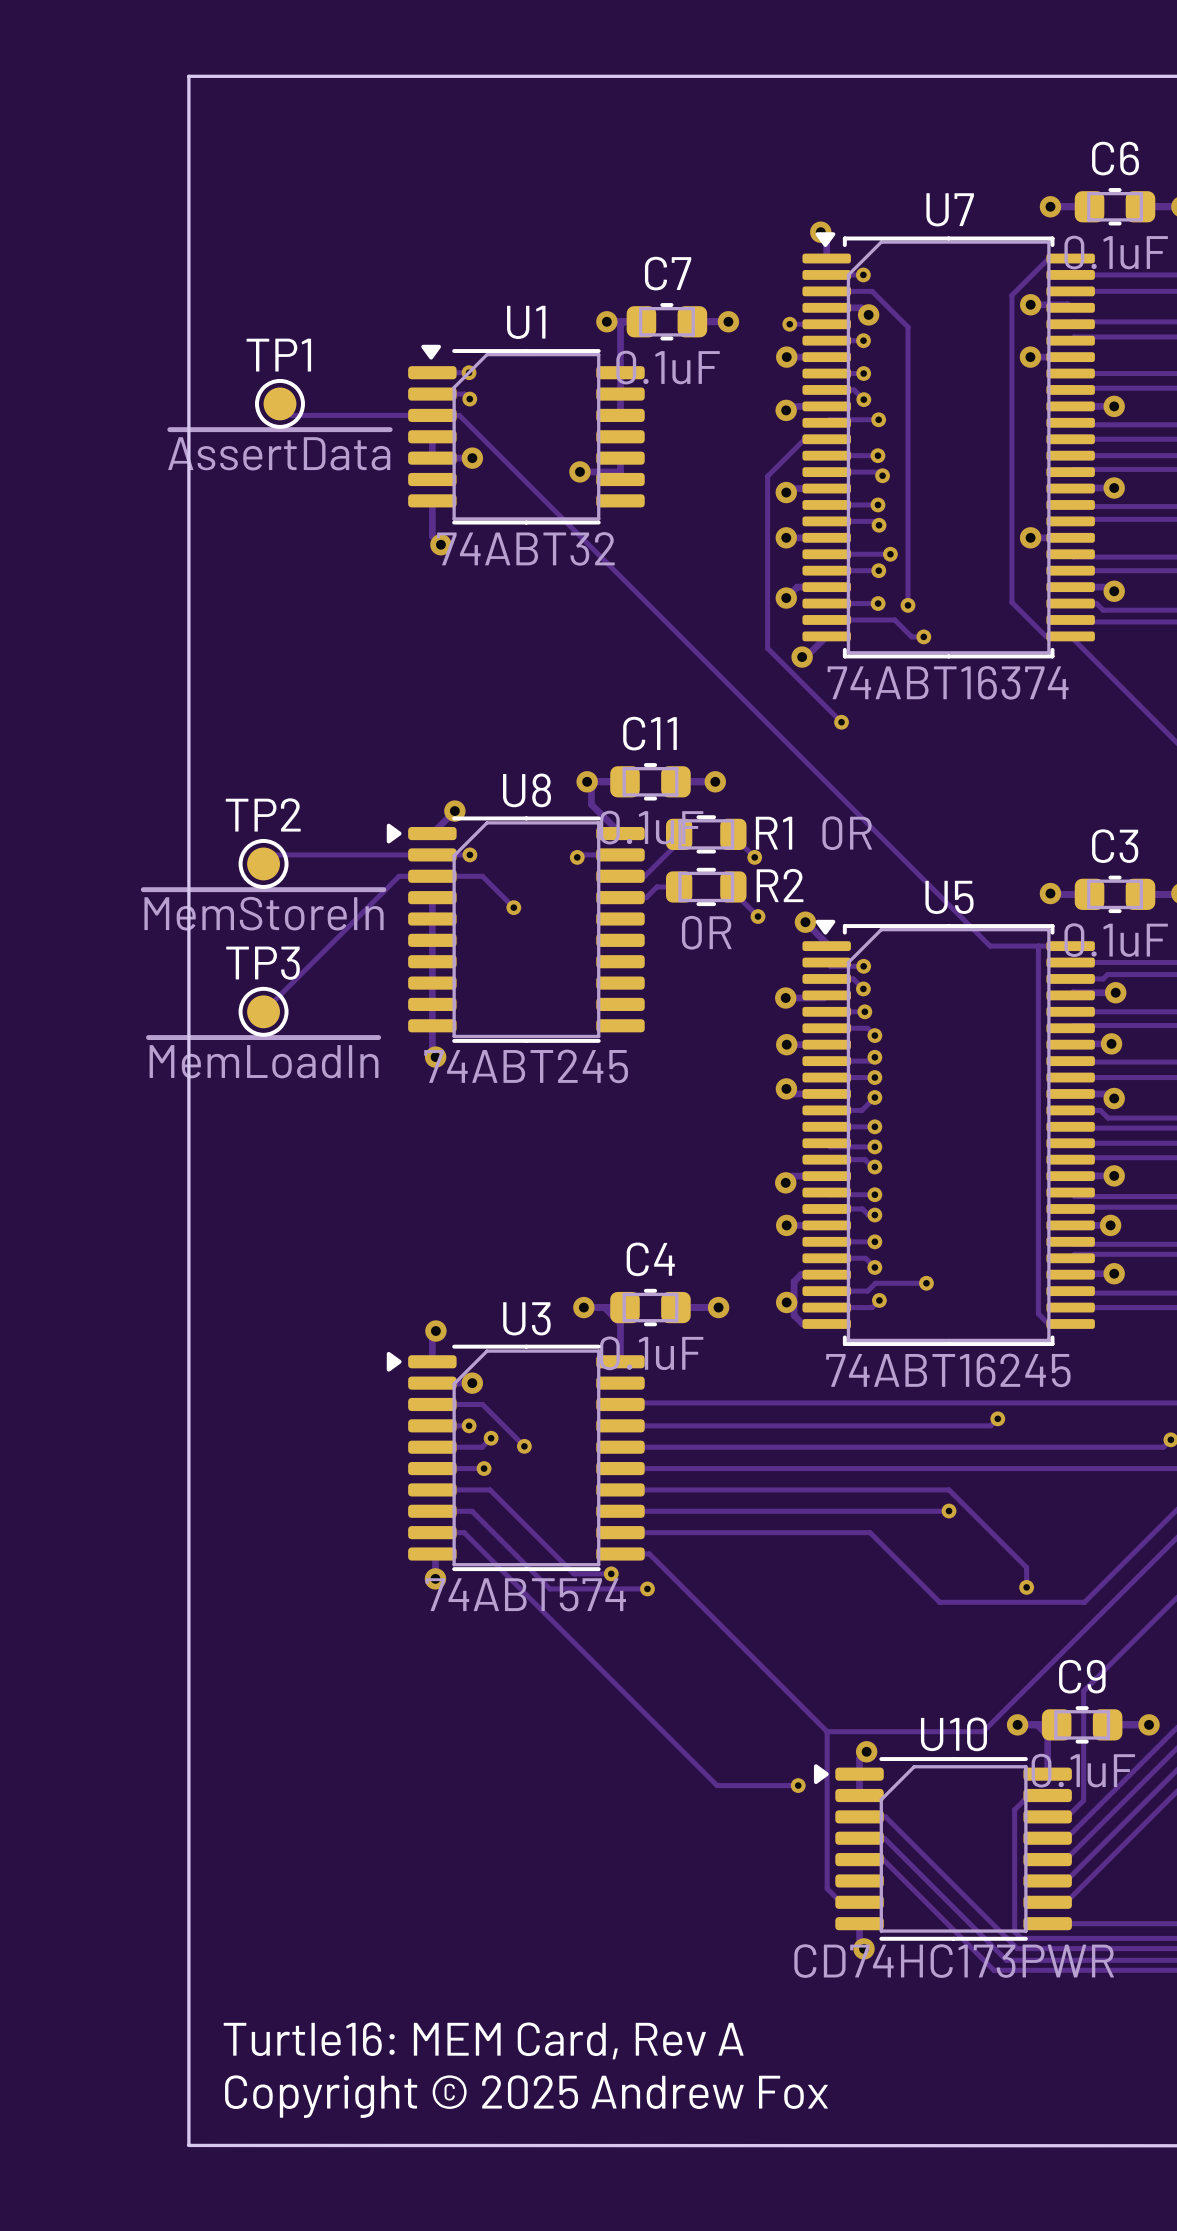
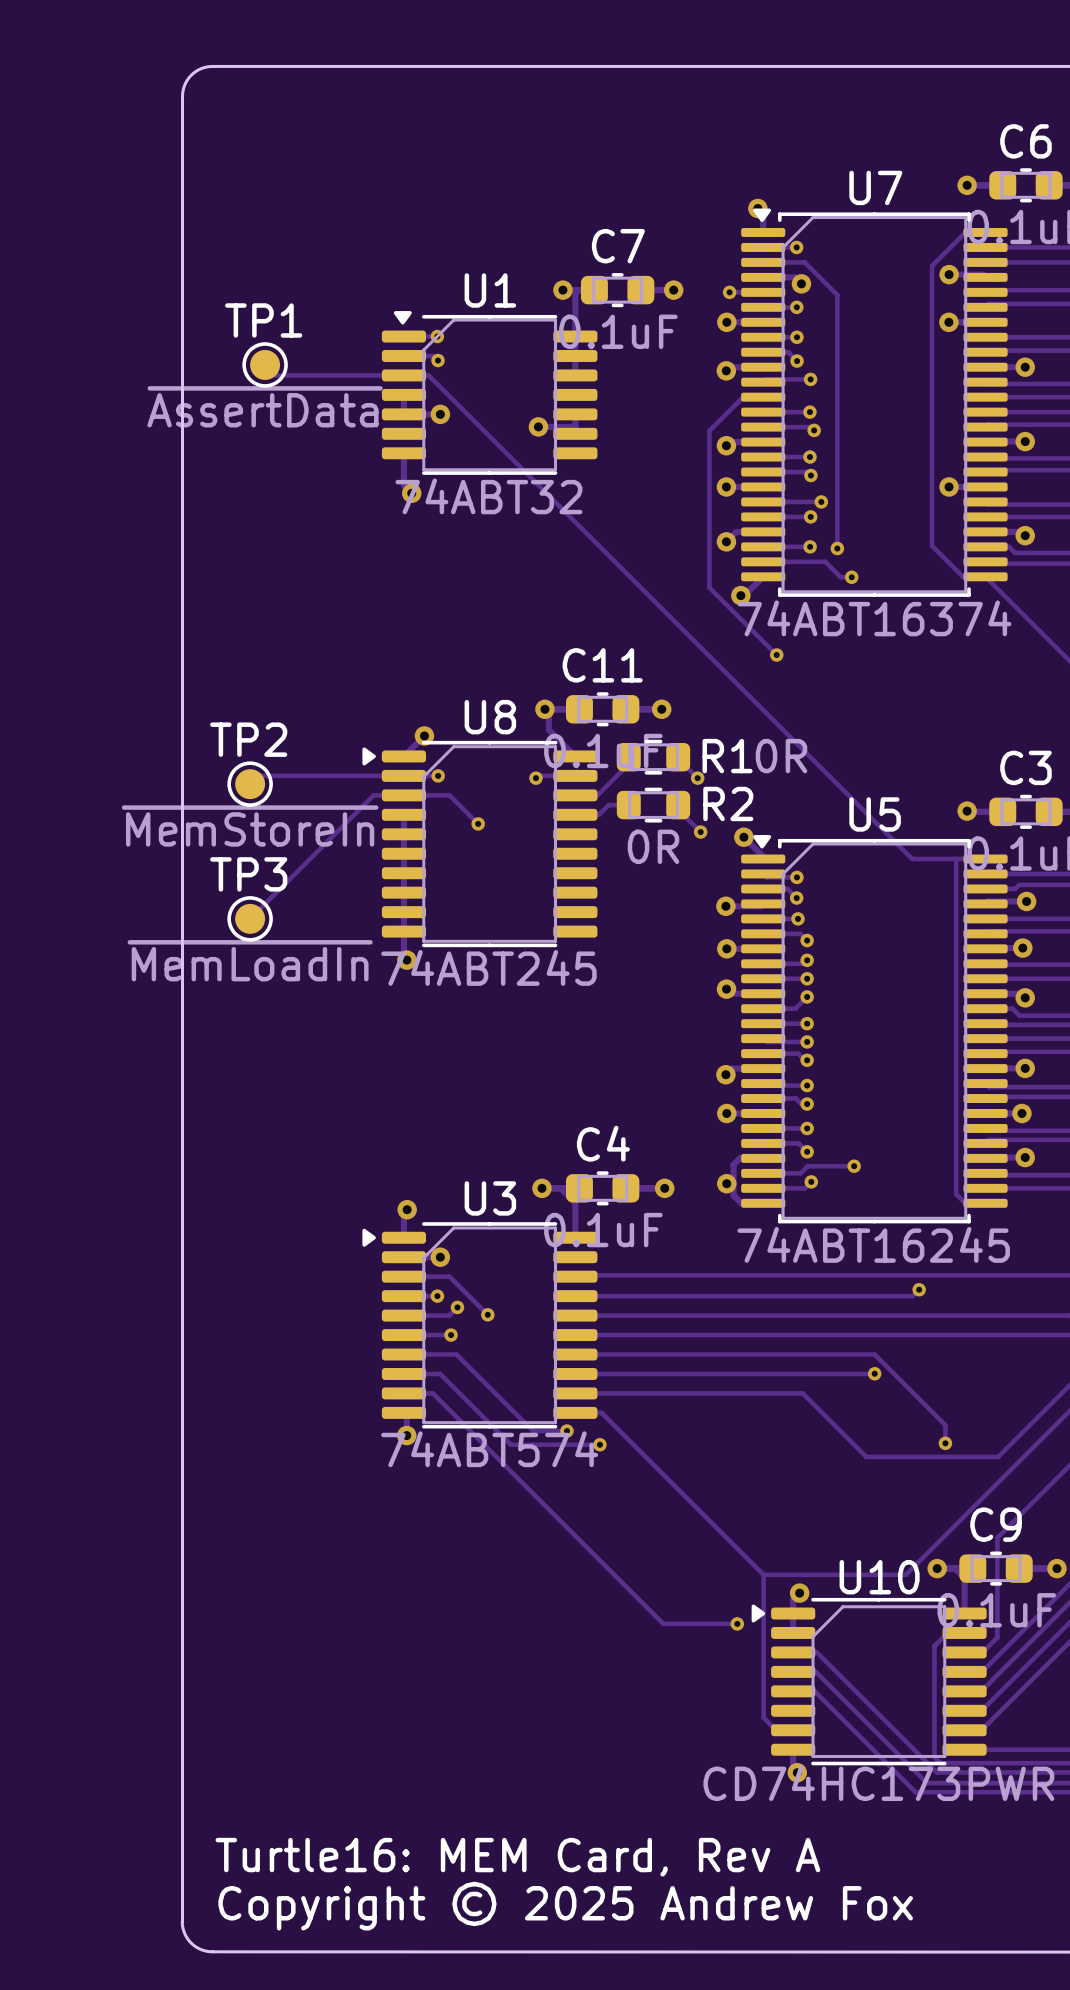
board edge: (222, 76) (188, 76) (188, 2145) (222, 2145) -> (212, 66) (202, 68) (191, 75) (185, 83) (182, 96) (182, 1921)
board edge: none -> (182, 1921) (185, 1934) (191, 1942) (199, 1948) (212, 1951)

